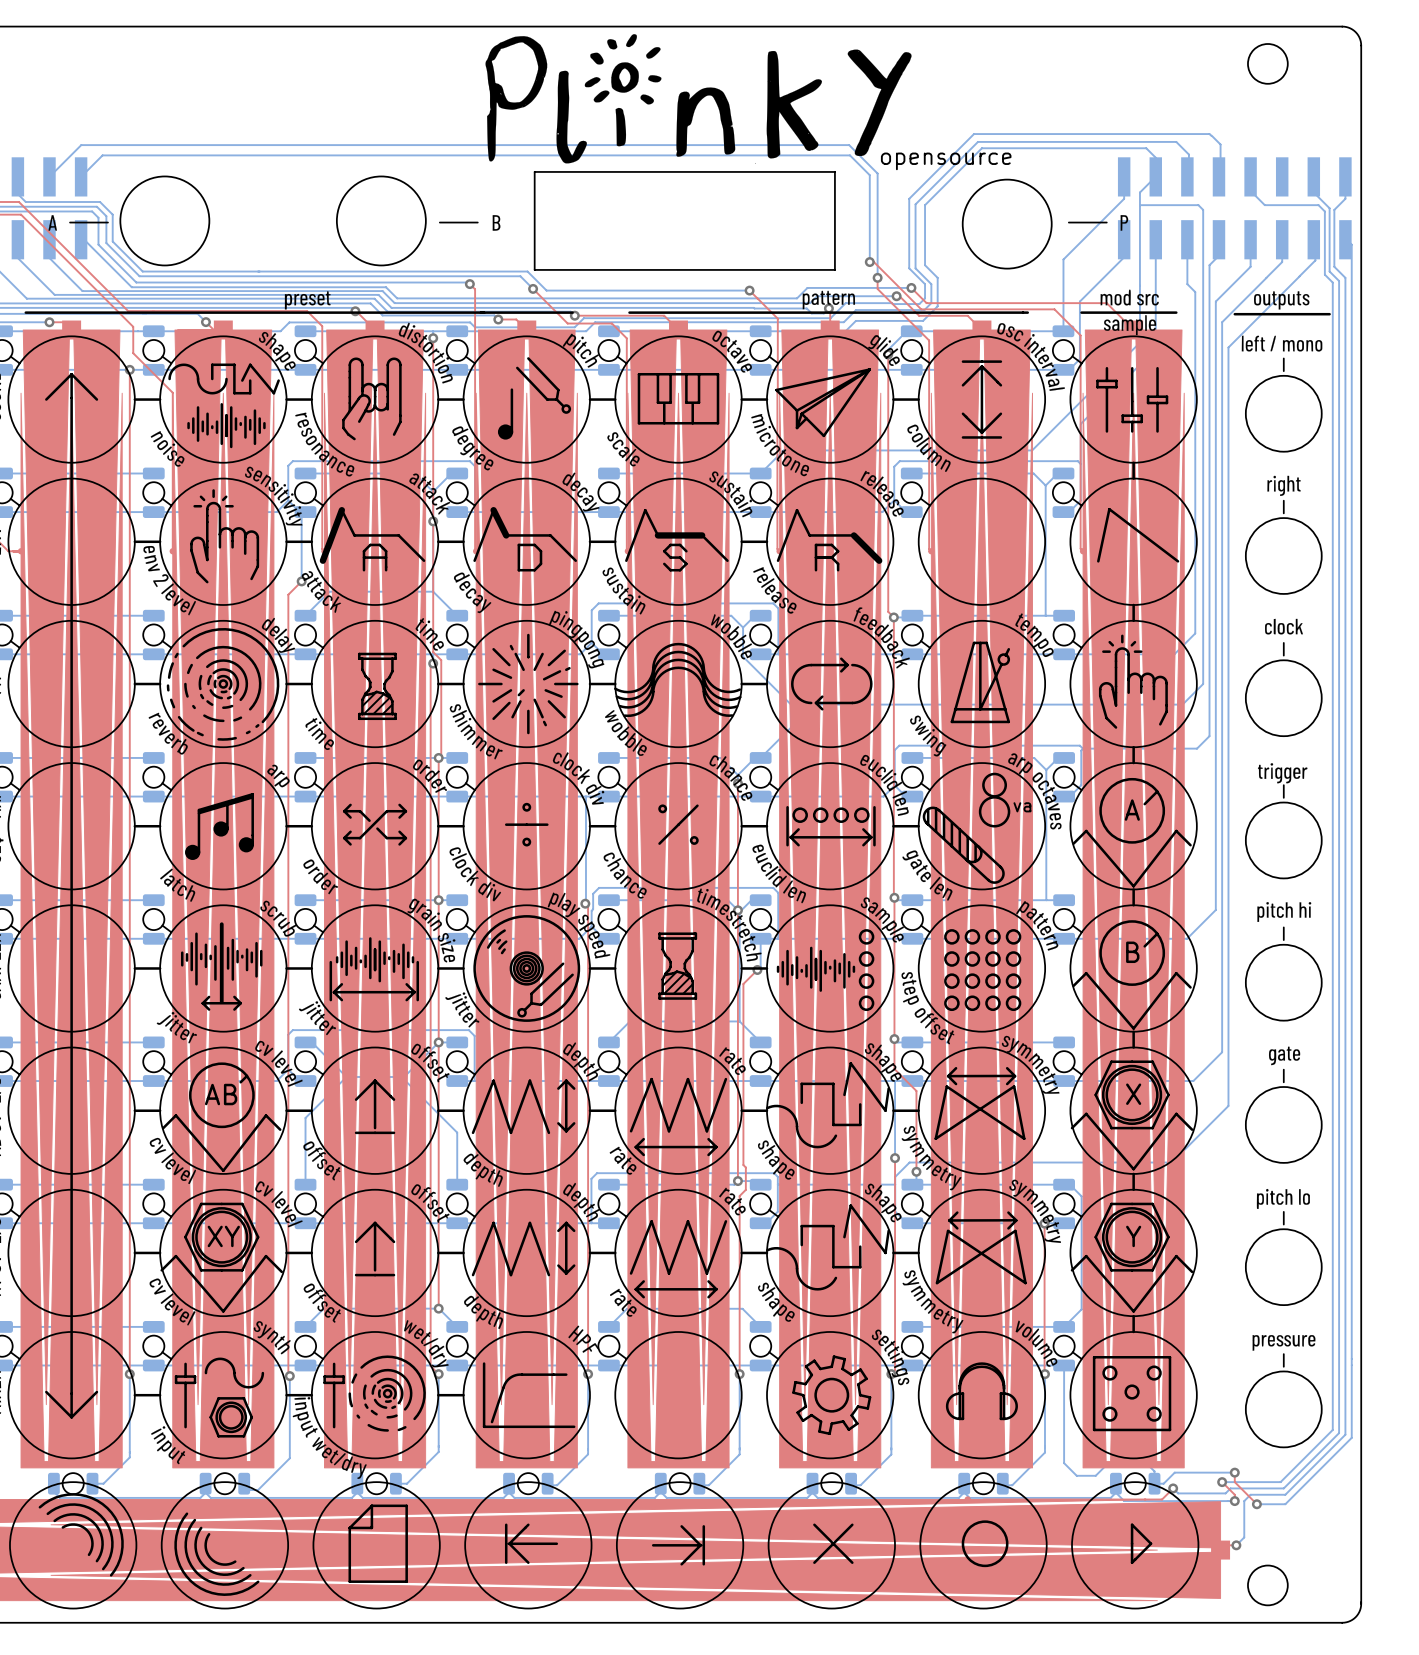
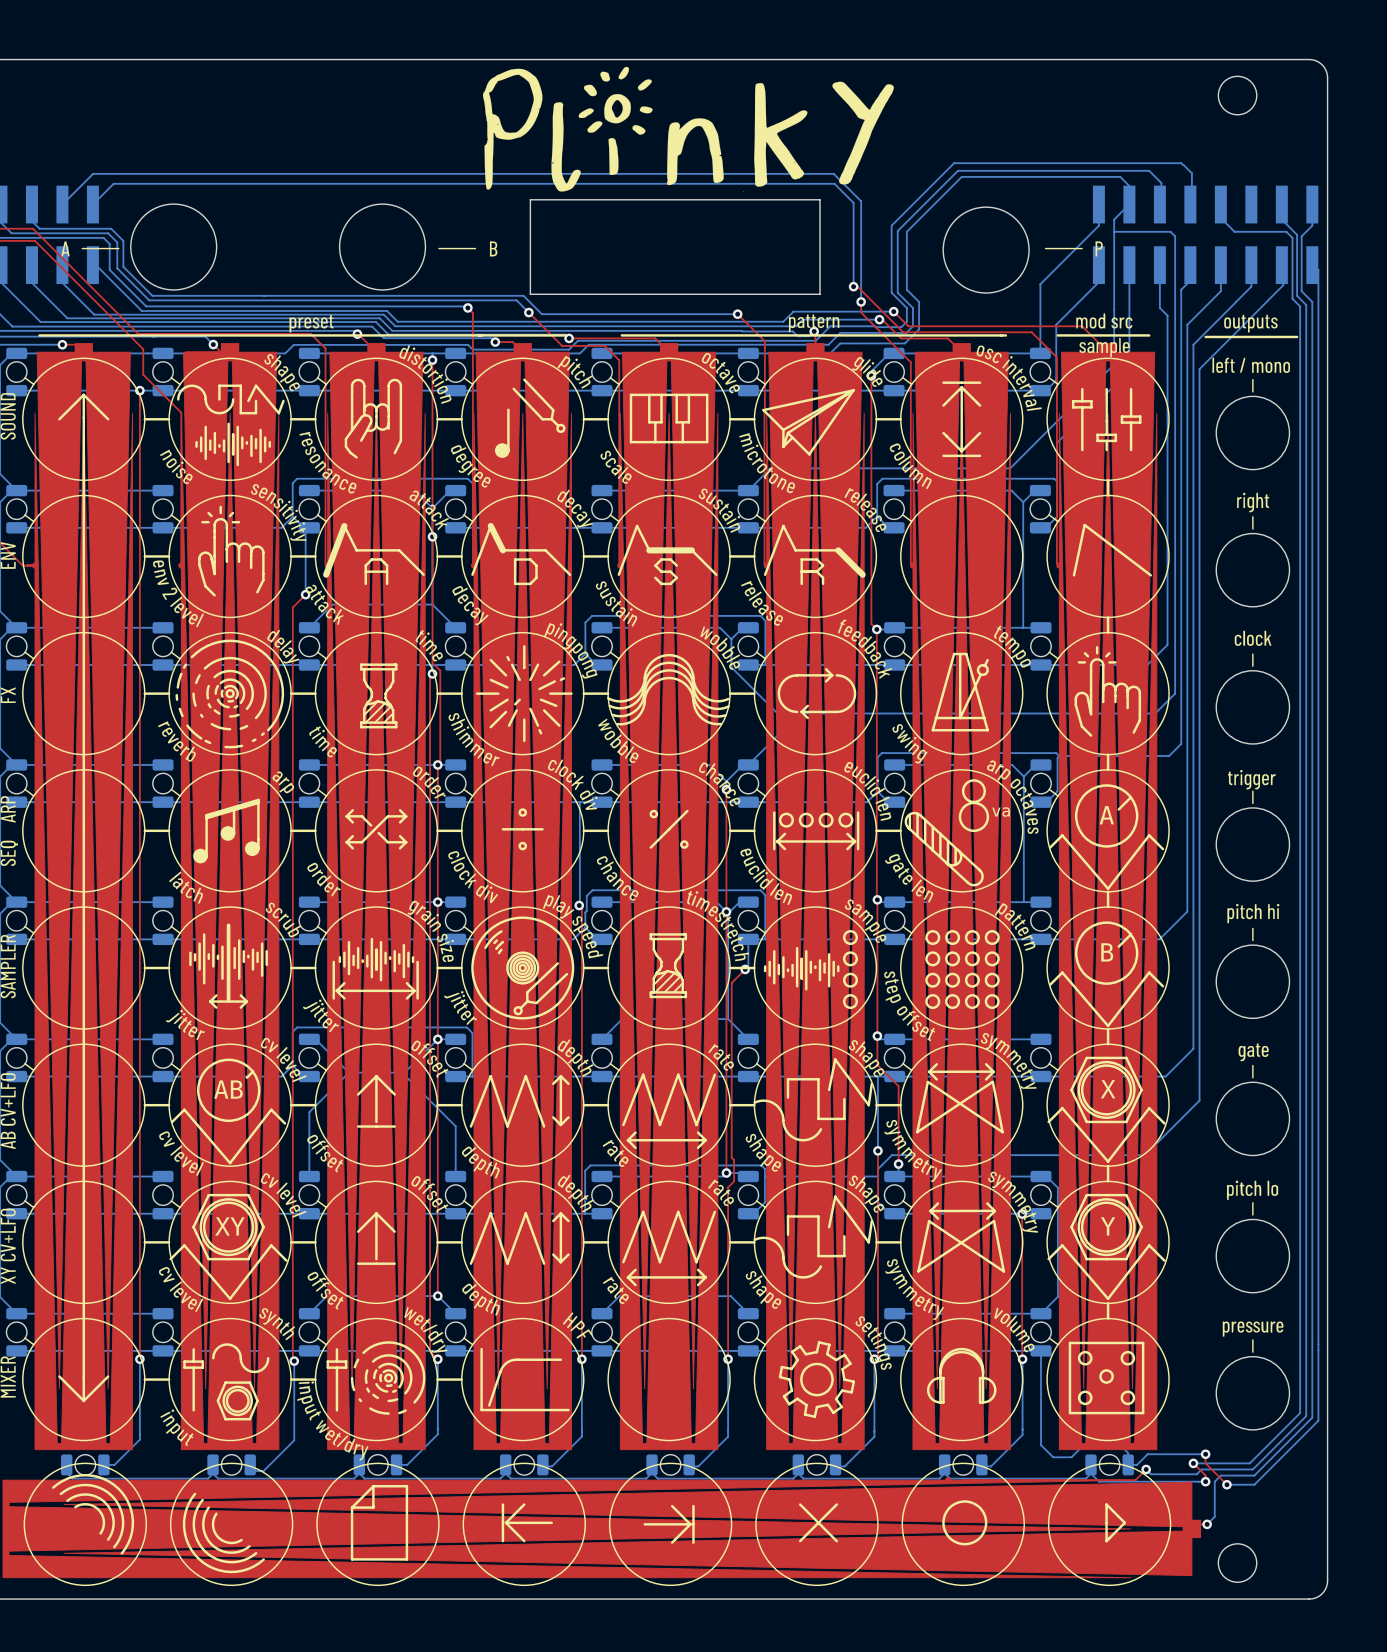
text: opensource (946, 161) -> none

